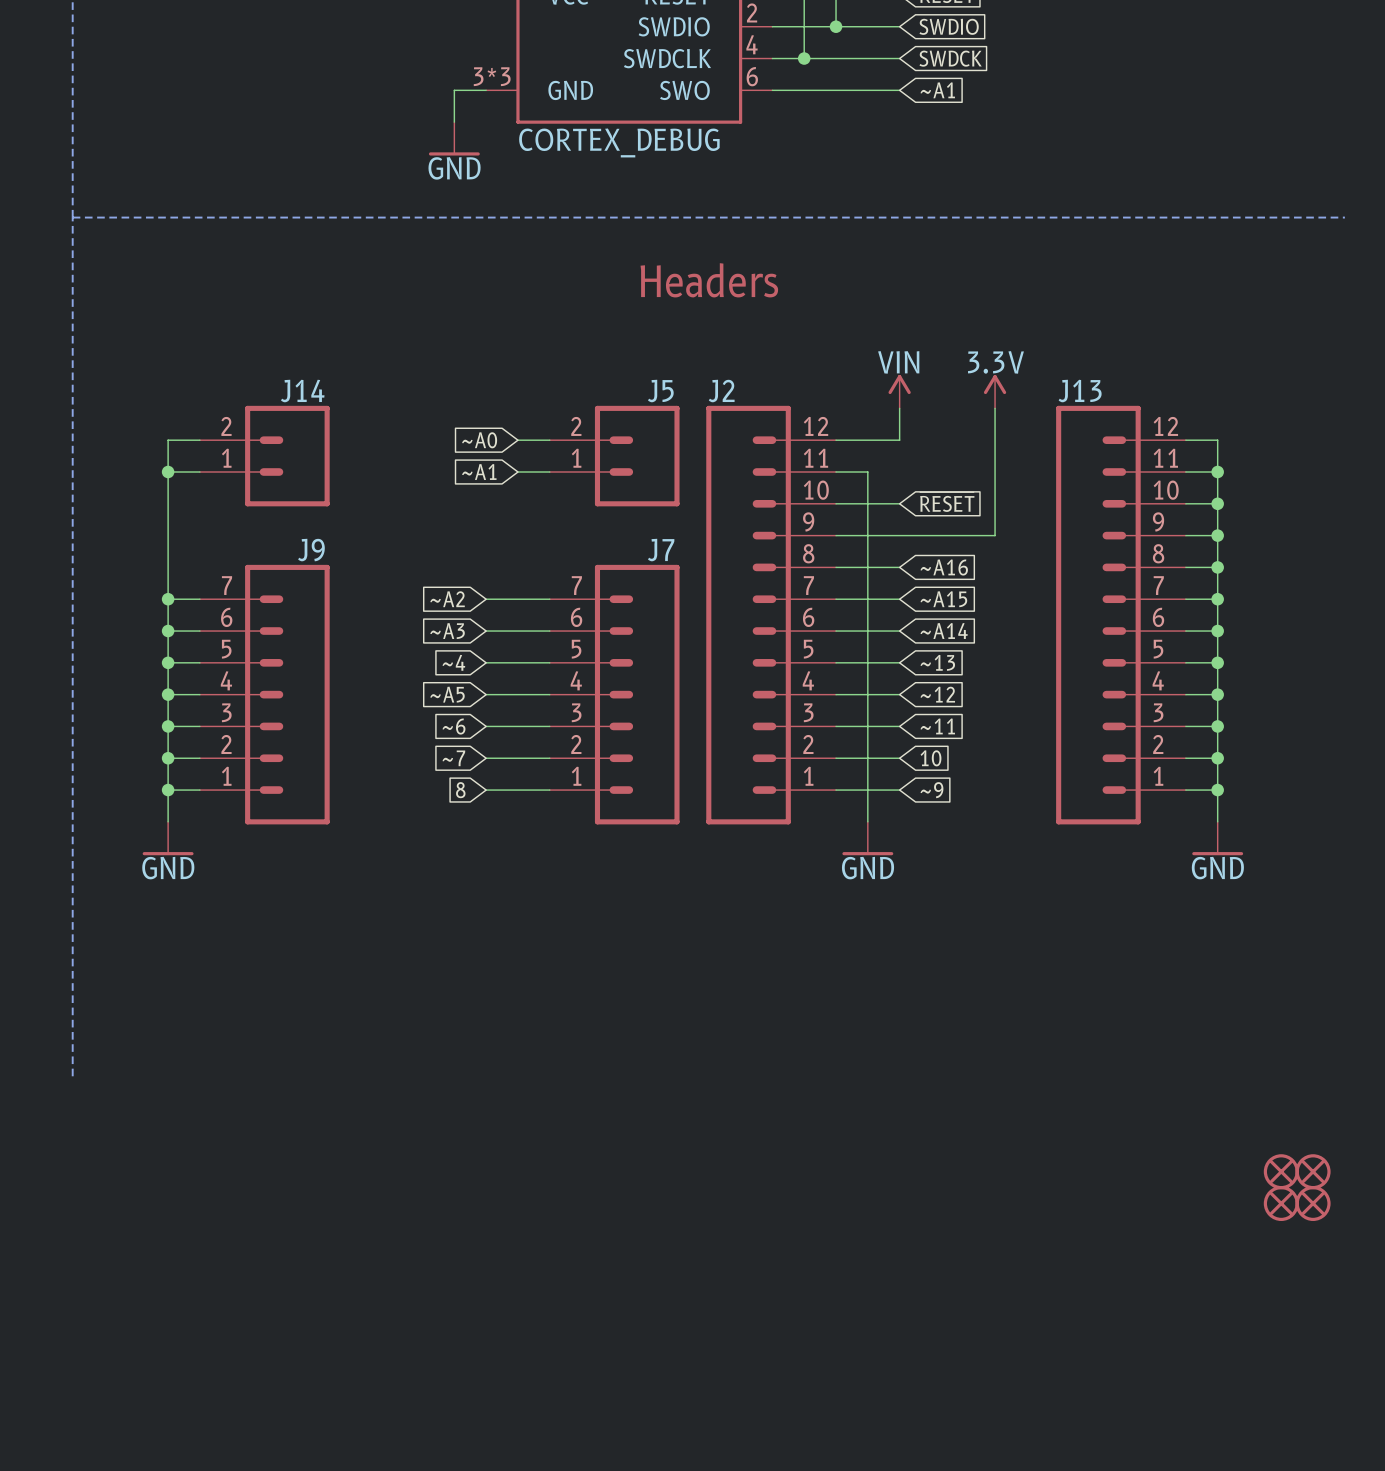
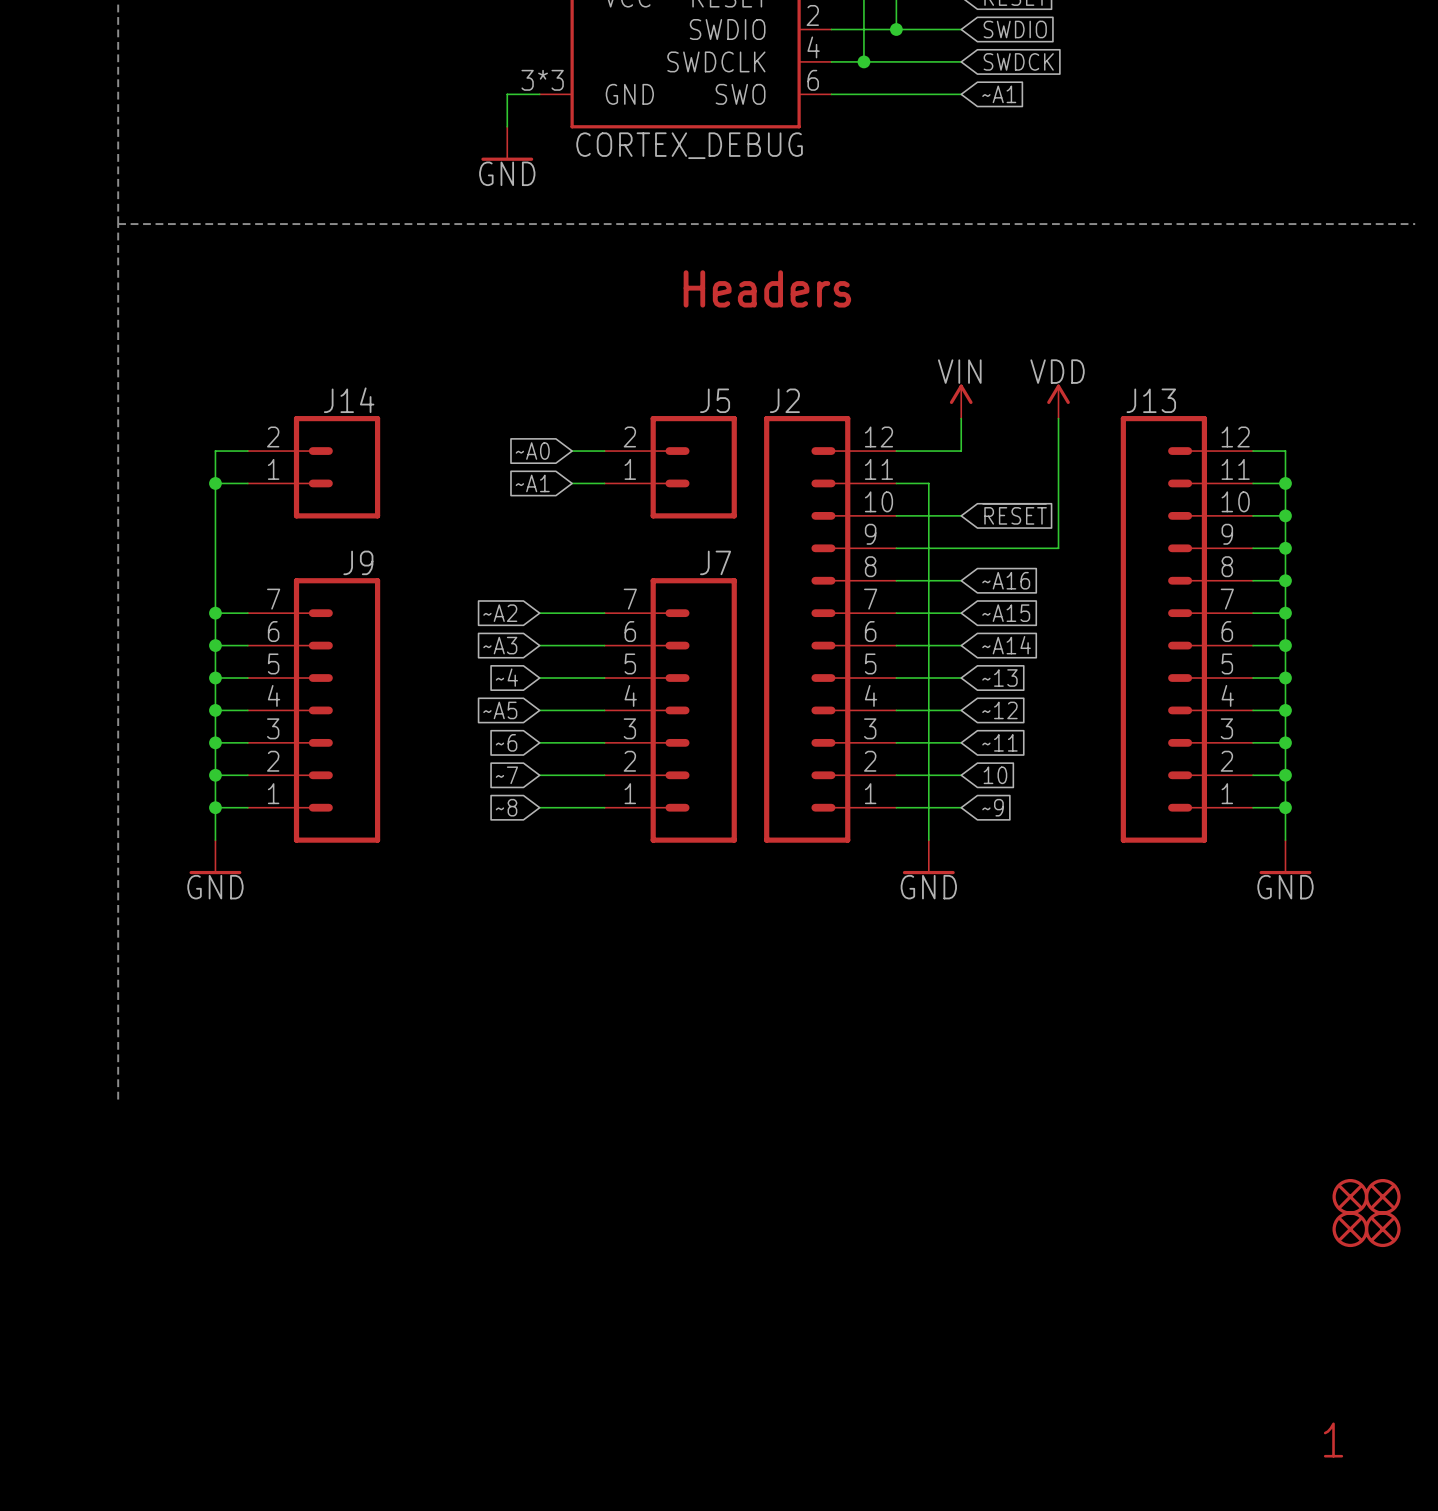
power symbol: 3.3V (995, 391) -> VDD (1058, 401)
global label: 8 (460, 790) -> ~8 (506, 807)
text: none -> 1 (1333, 1440)

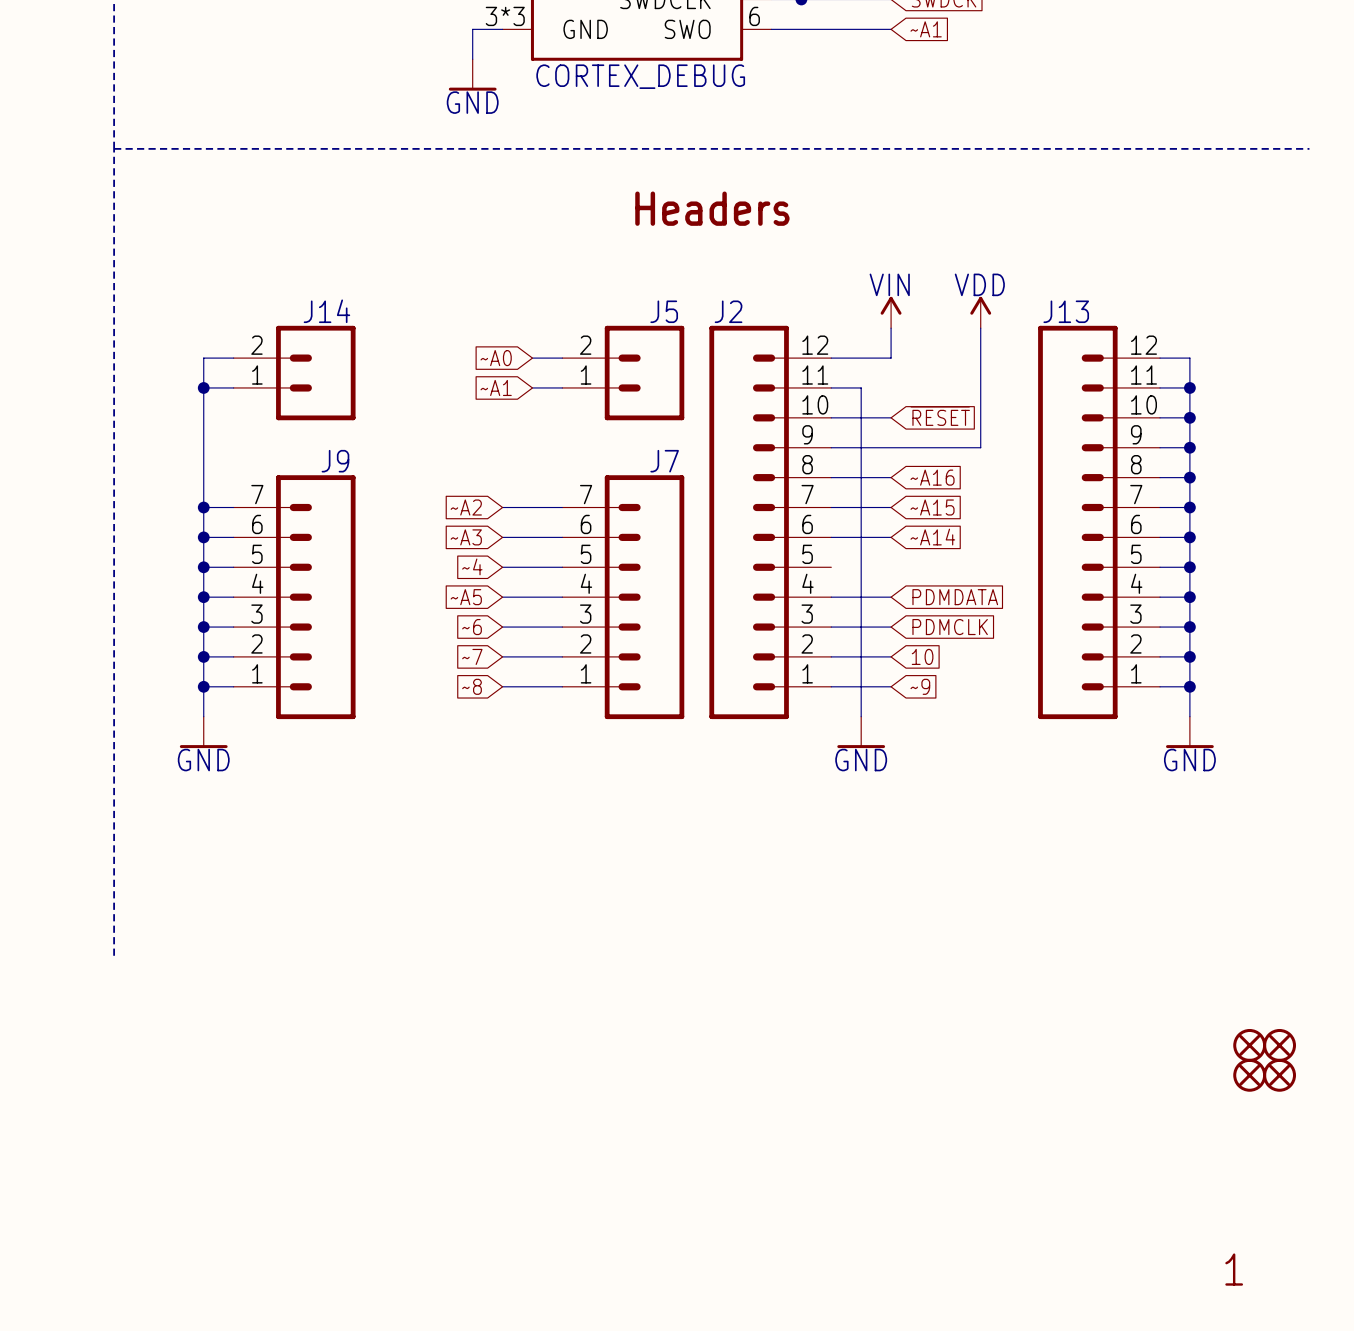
wire: (896, 678) (961, 678) -> none
global label: ~13 (999, 678) -> none
global label: ~12 (999, 710) -> PDMDATA (955, 597)
global label: ~11 (999, 742) -> PDMCLK (950, 627)

